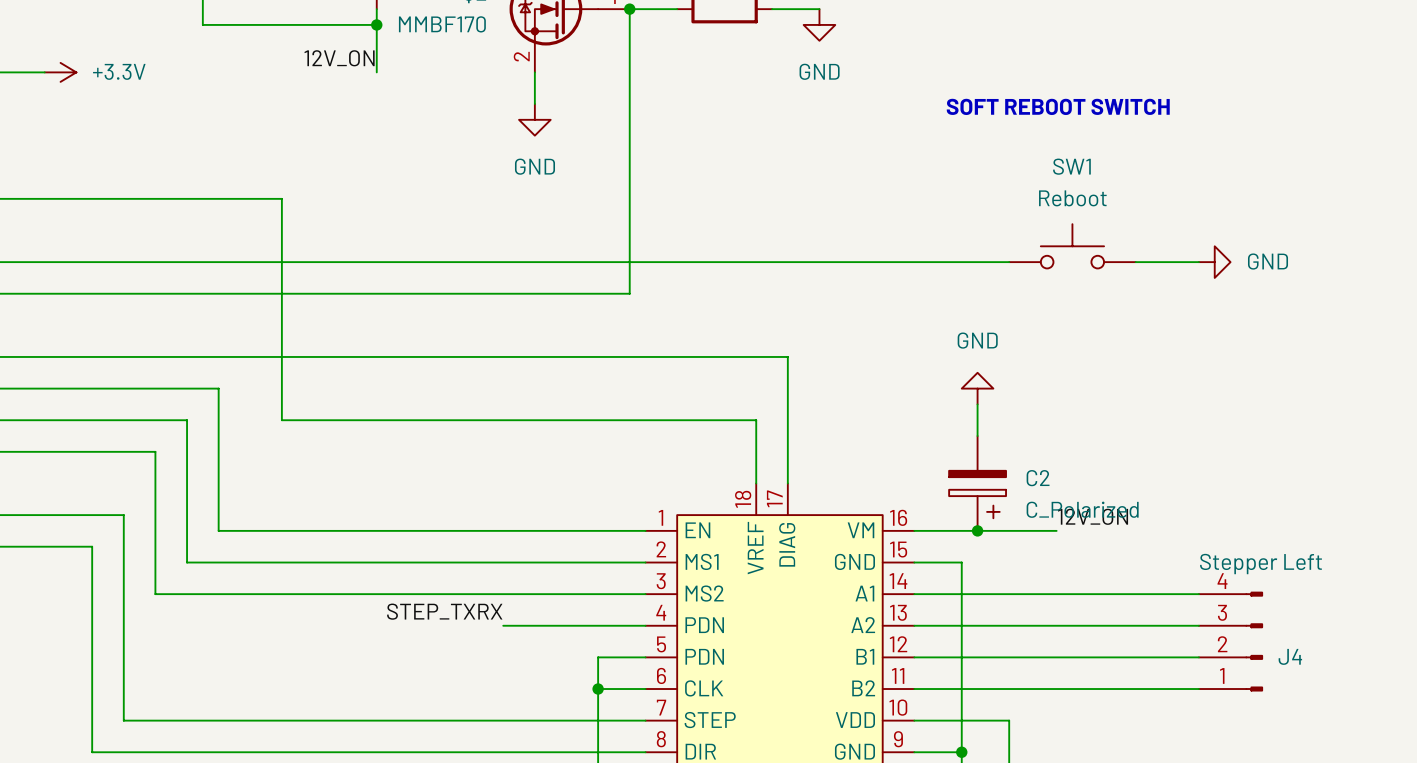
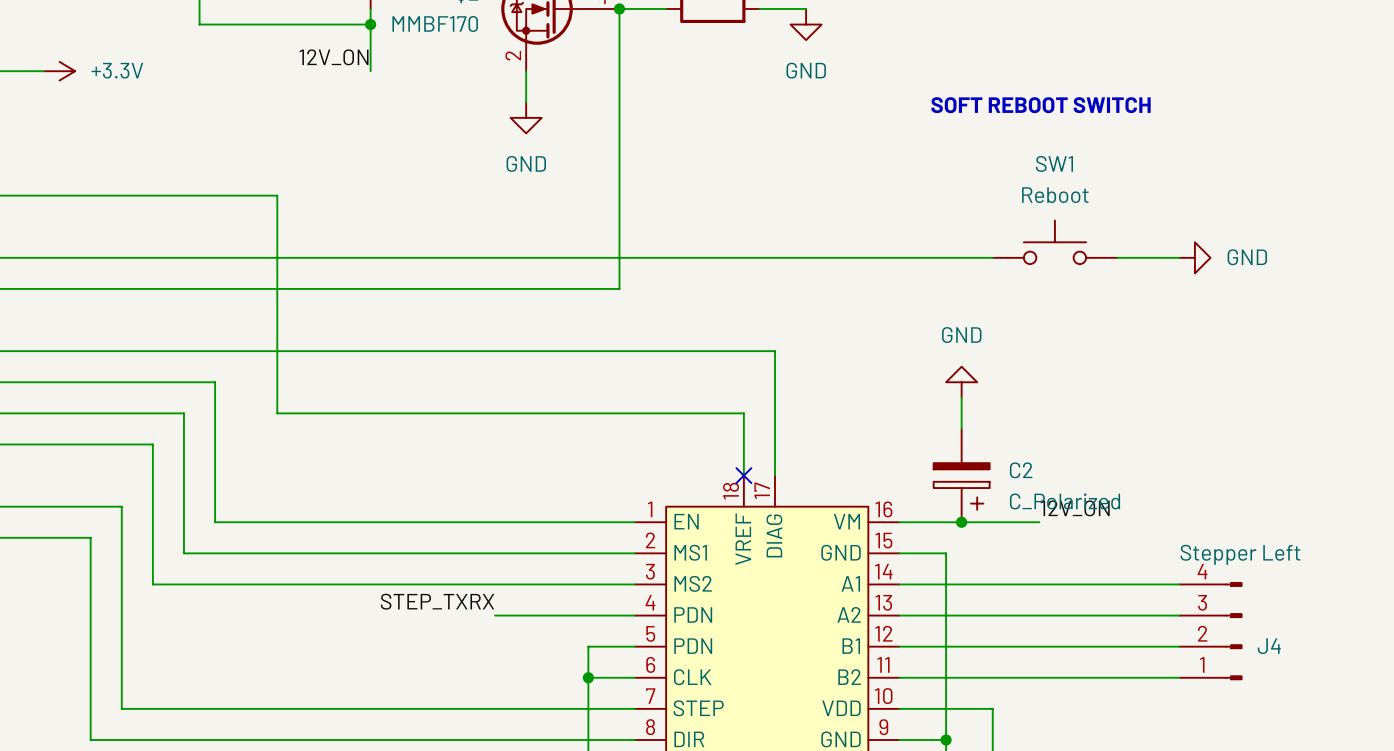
no-connect mark: none -> (743, 475)

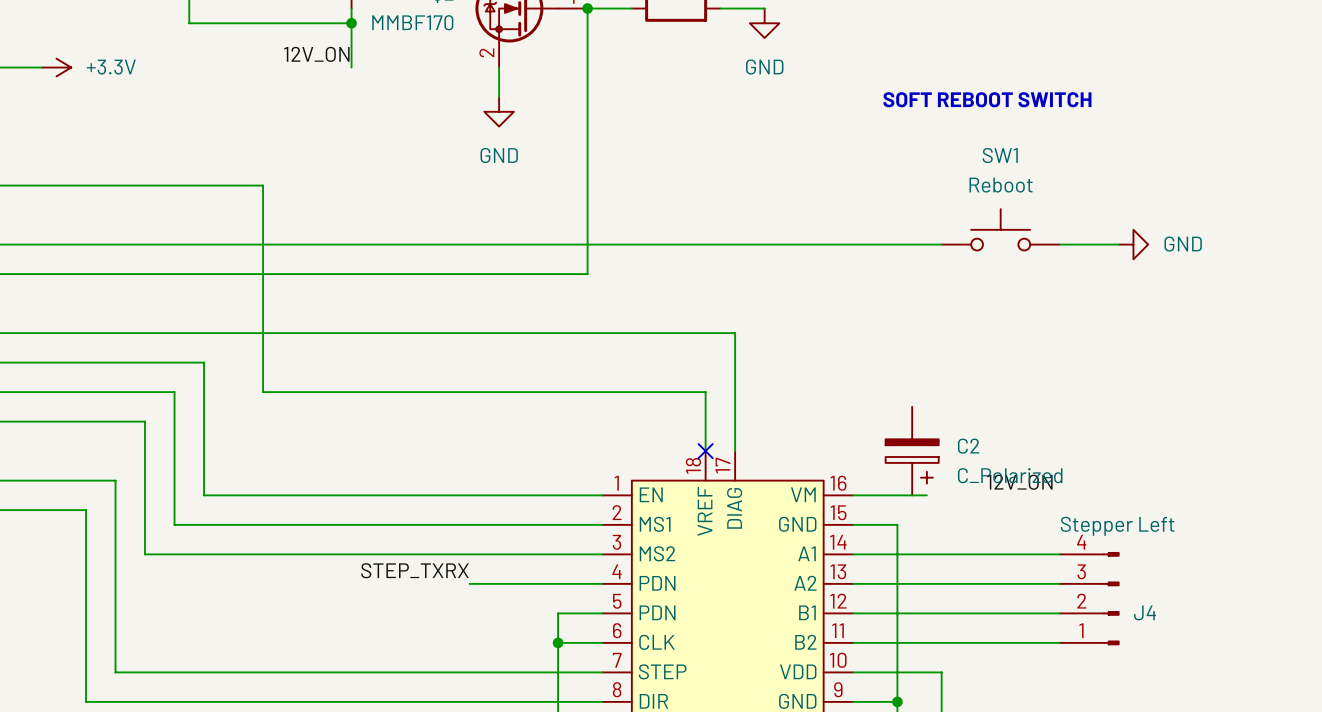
power symbol: GND (961, 382) -> none
wire: (961, 397) (961, 428) -> none
junction: (961, 522) -> none
wire: (977, 522) (1039, 522) -> none
J4 position: (1210, 631) -> (1089, 598)

